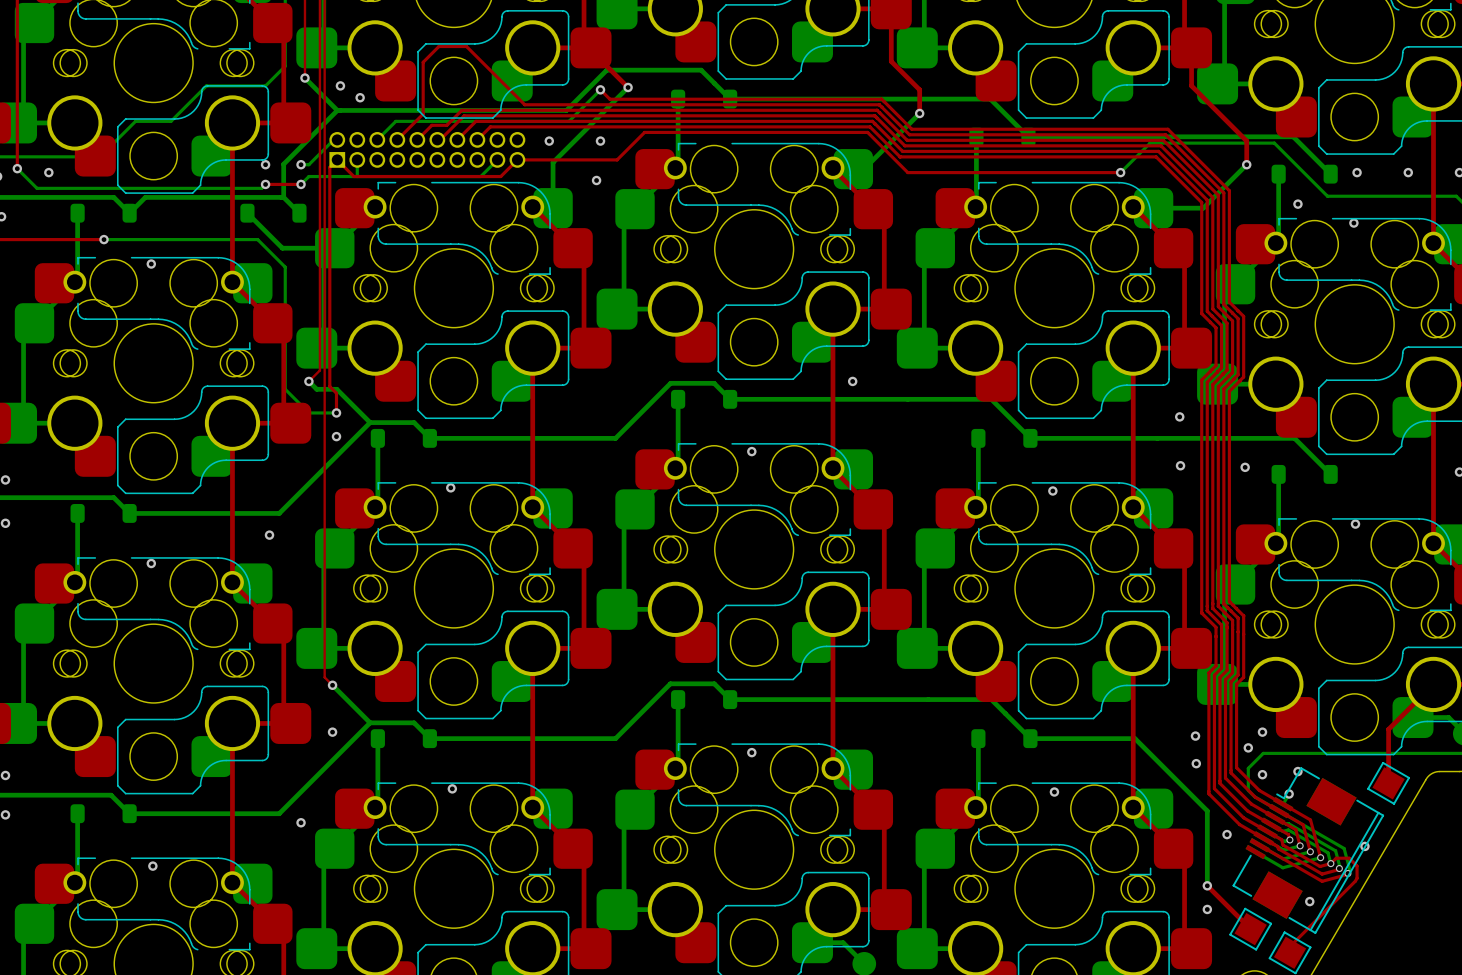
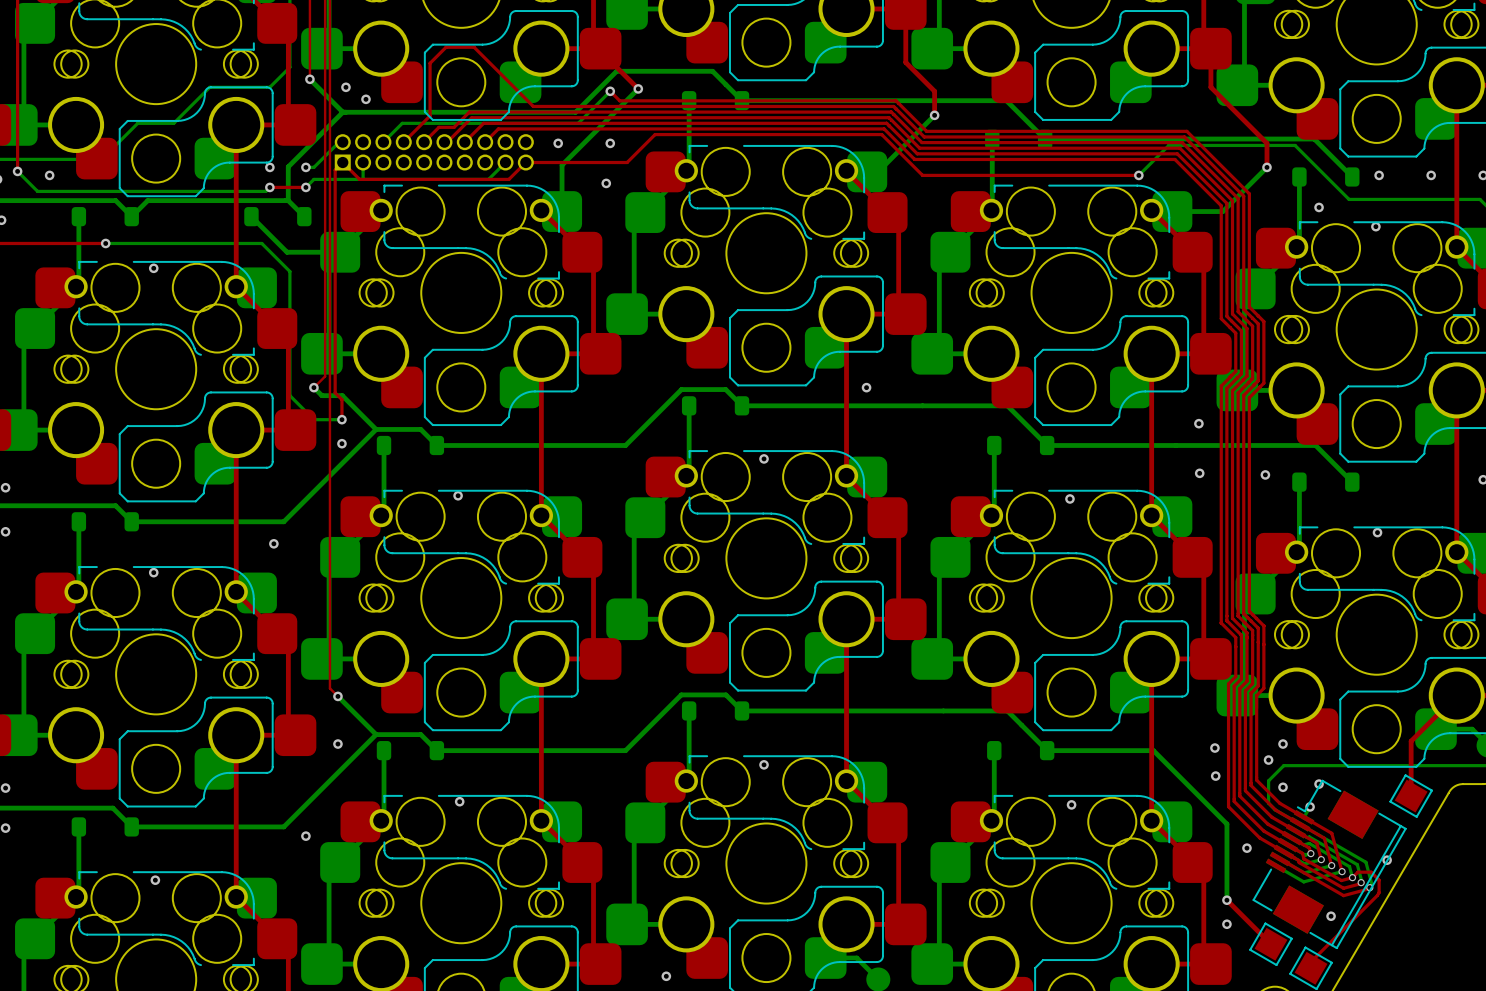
via: none -> (666, 976)

